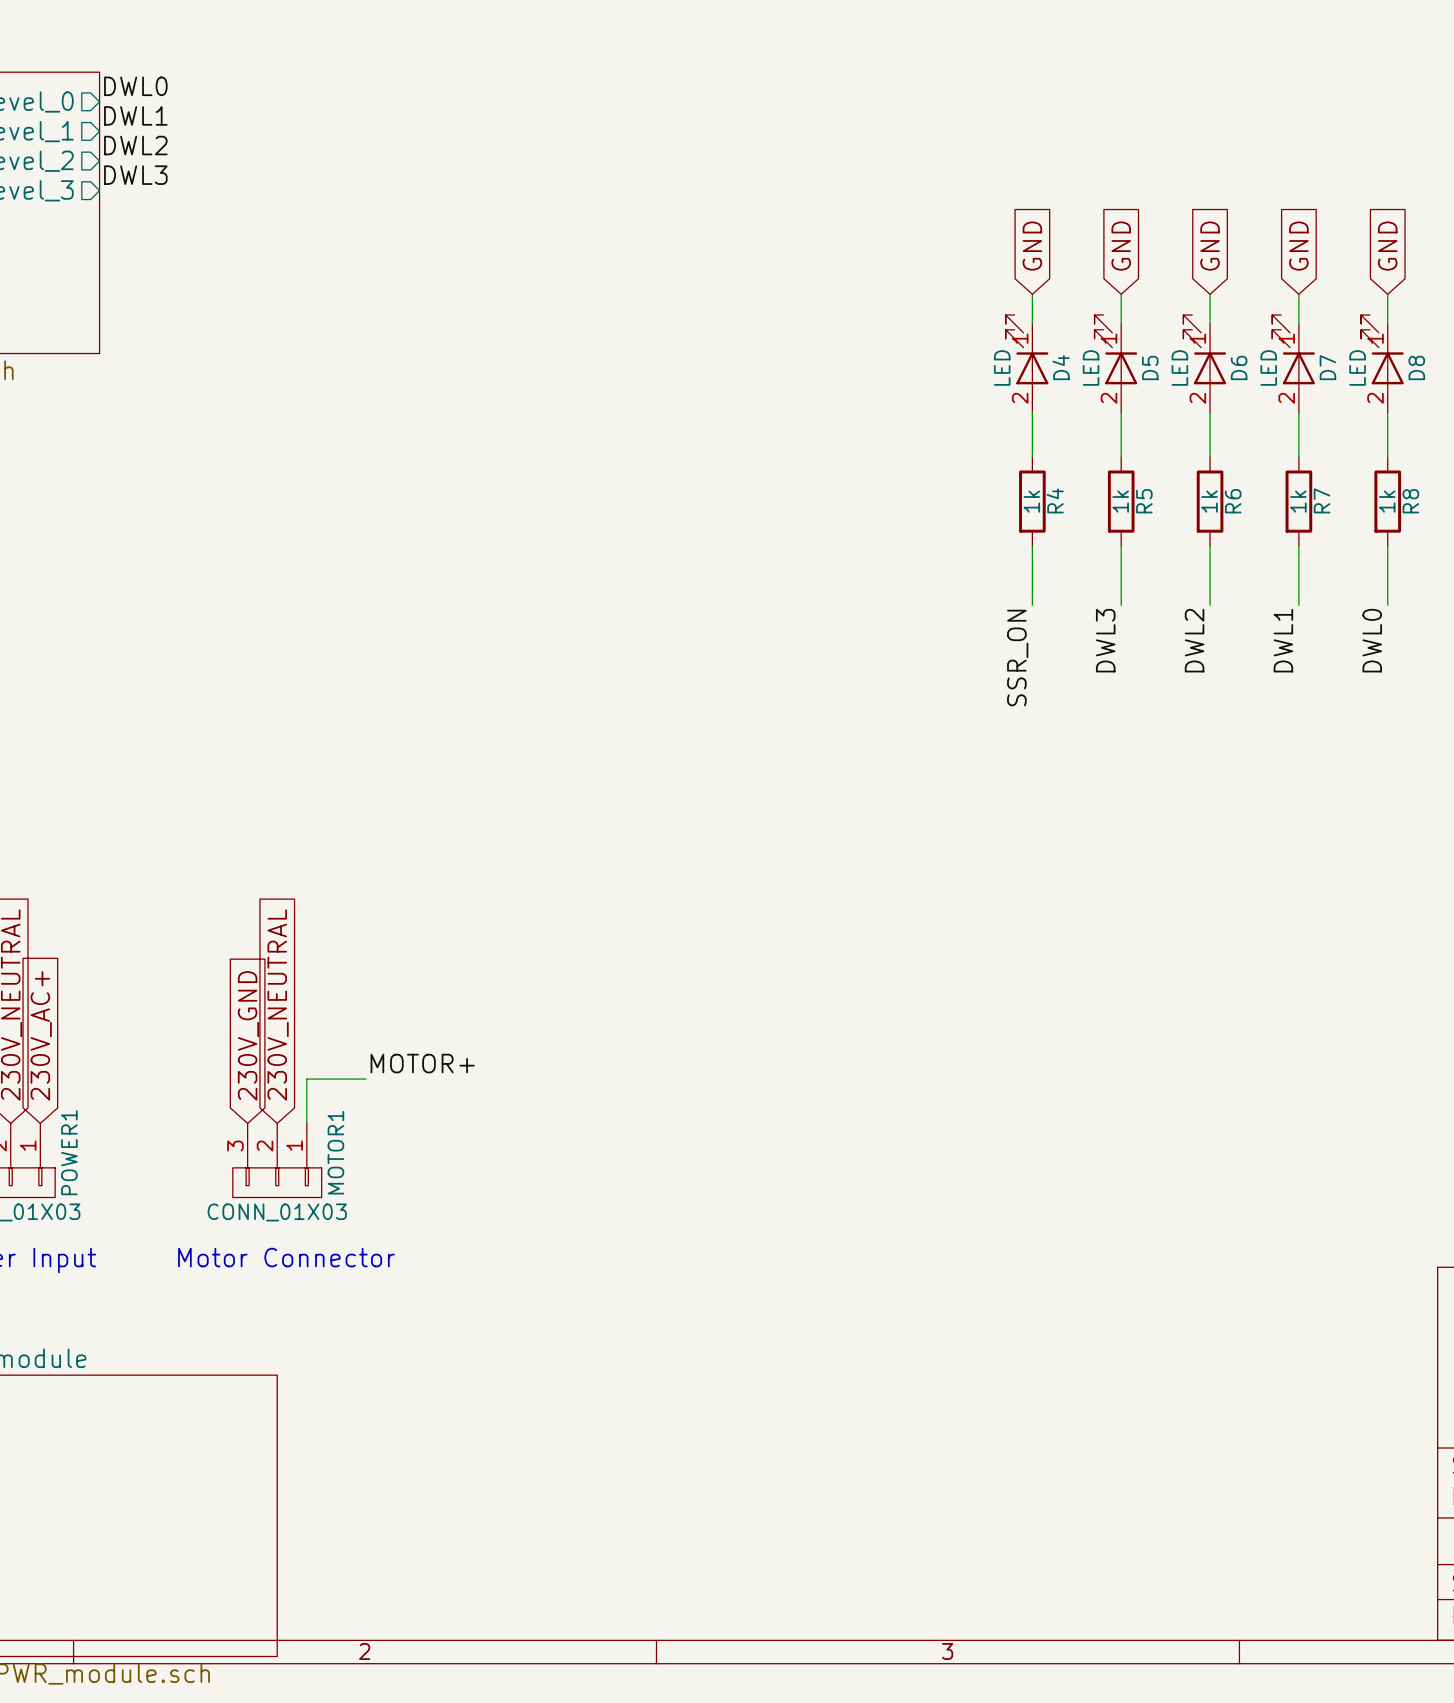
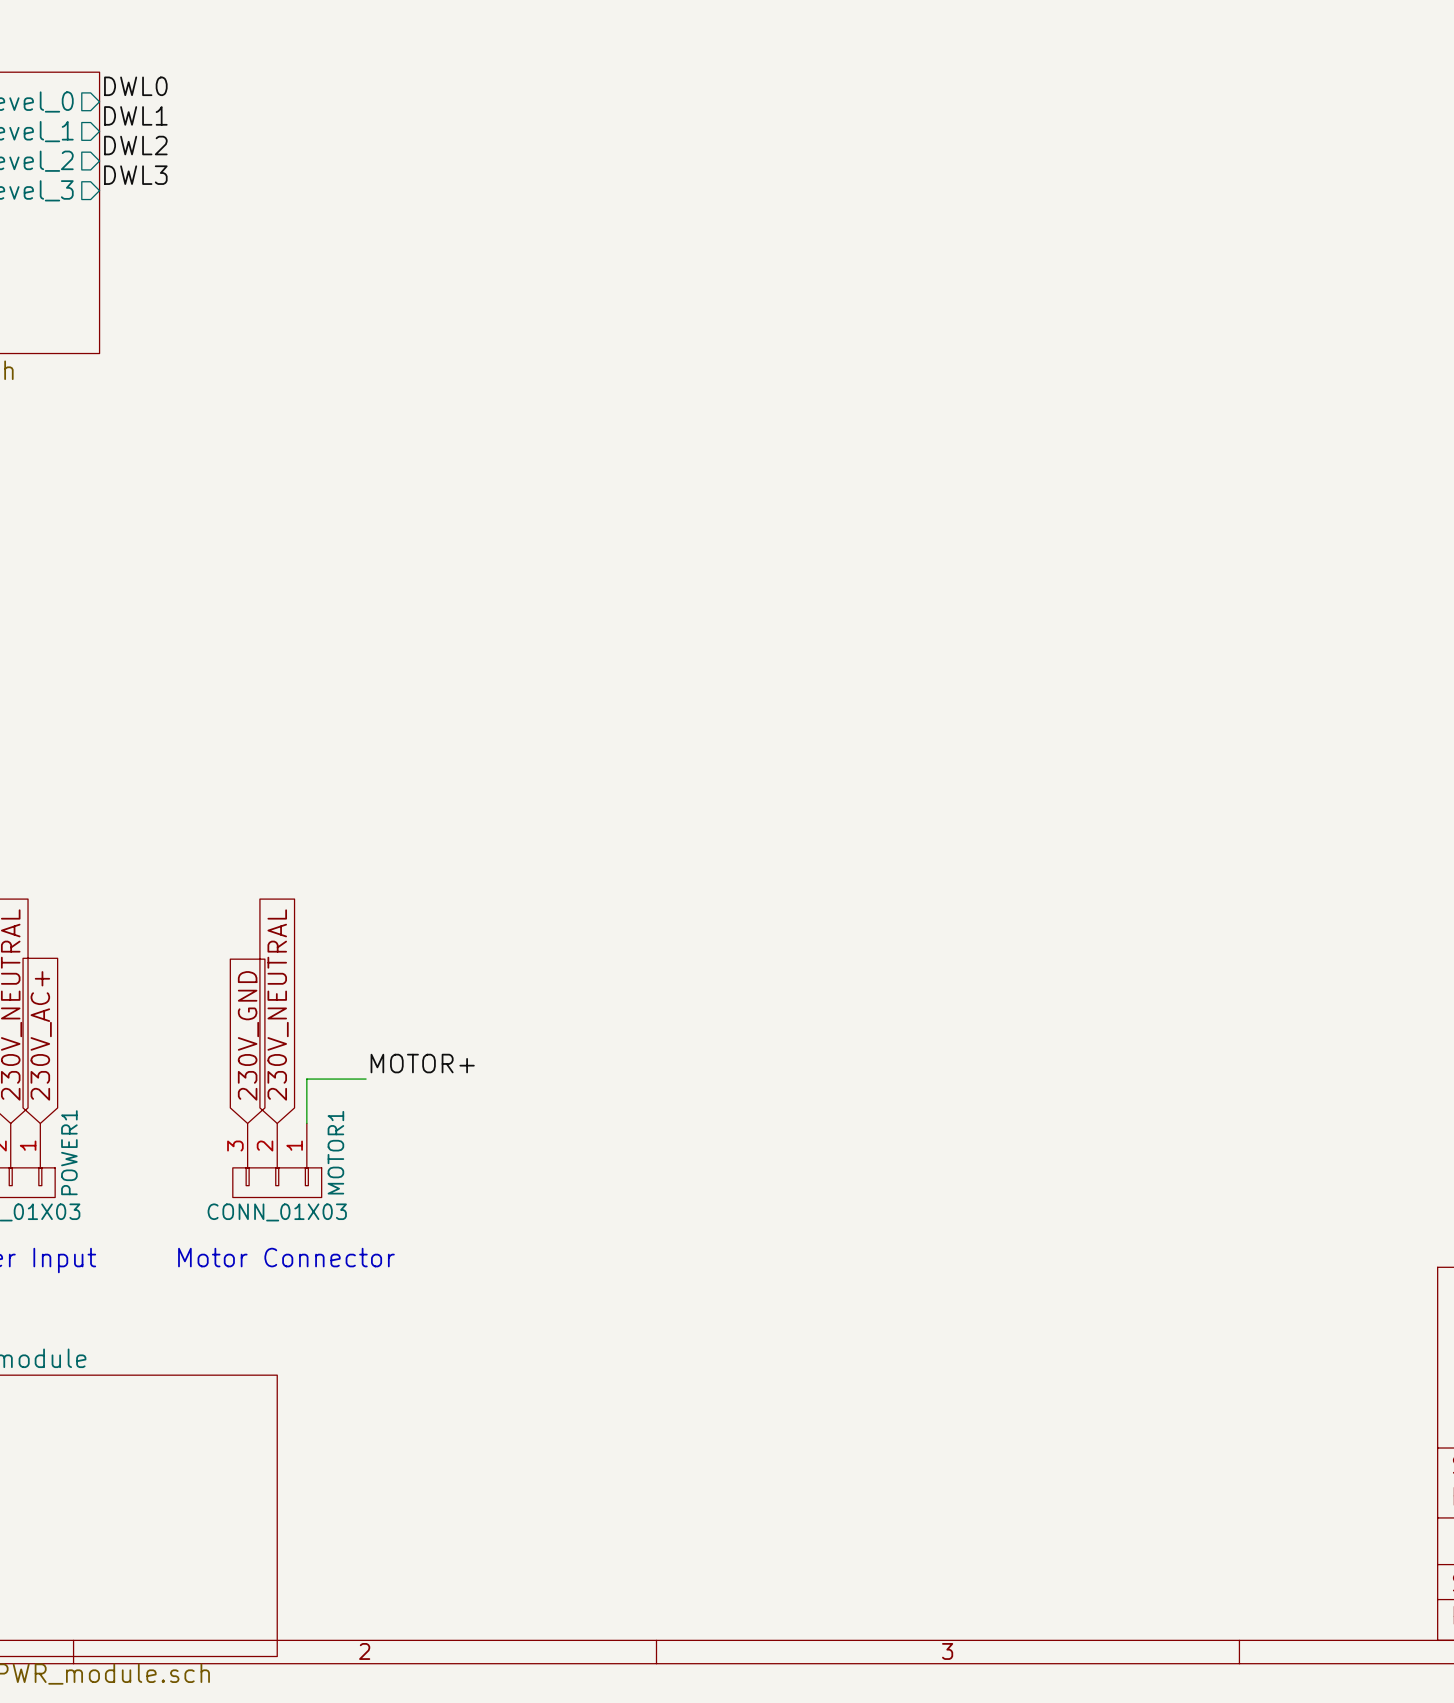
global label: GND (1032, 246) -> none
global label: GND (1121, 246) -> none
global label: GND (1210, 246) -> none
global label: GND (1298, 246) -> none
global label: GND (1387, 246) -> none
wire: (1032, 294) (1032, 323) -> none
wire: (1121, 294) (1121, 323) -> none
wire: (1210, 294) (1210, 323) -> none
wire: (1298, 294) (1298, 323) -> none
wire: (1387, 294) (1387, 323) -> none
D4: LED (1027, 363) -> none
D5: LED (1115, 363) -> none
D6: LED (1204, 363) -> none
D7: LED (1293, 363) -> none
D8: LED (1382, 363) -> none
wire: (1032, 412) (1032, 457) -> none
wire: (1121, 412) (1121, 457) -> none
wire: (1210, 412) (1210, 457) -> none
wire: (1298, 412) (1298, 457) -> none
wire: (1387, 412) (1387, 457) -> none
R4: 1k (1032, 501) -> none
R5: 1k (1121, 501) -> none
R6: 1k (1210, 501) -> none
R7: 1k (1298, 501) -> none
R8: 1k (1387, 501) -> none
wire: (1032, 546) (1032, 605) -> none
wire: (1121, 546) (1121, 605) -> none
wire: (1210, 546) (1210, 605) -> none
wire: (1298, 546) (1298, 605) -> none
wire: (1387, 546) (1387, 605) -> none
label: DWL3 (1105, 640) -> none
label: DWL2 (1194, 640) -> none
label: DWL1 (1283, 640) -> none
label: DWL0 (1372, 640) -> none
label: SSR_ON (1017, 658) -> none

